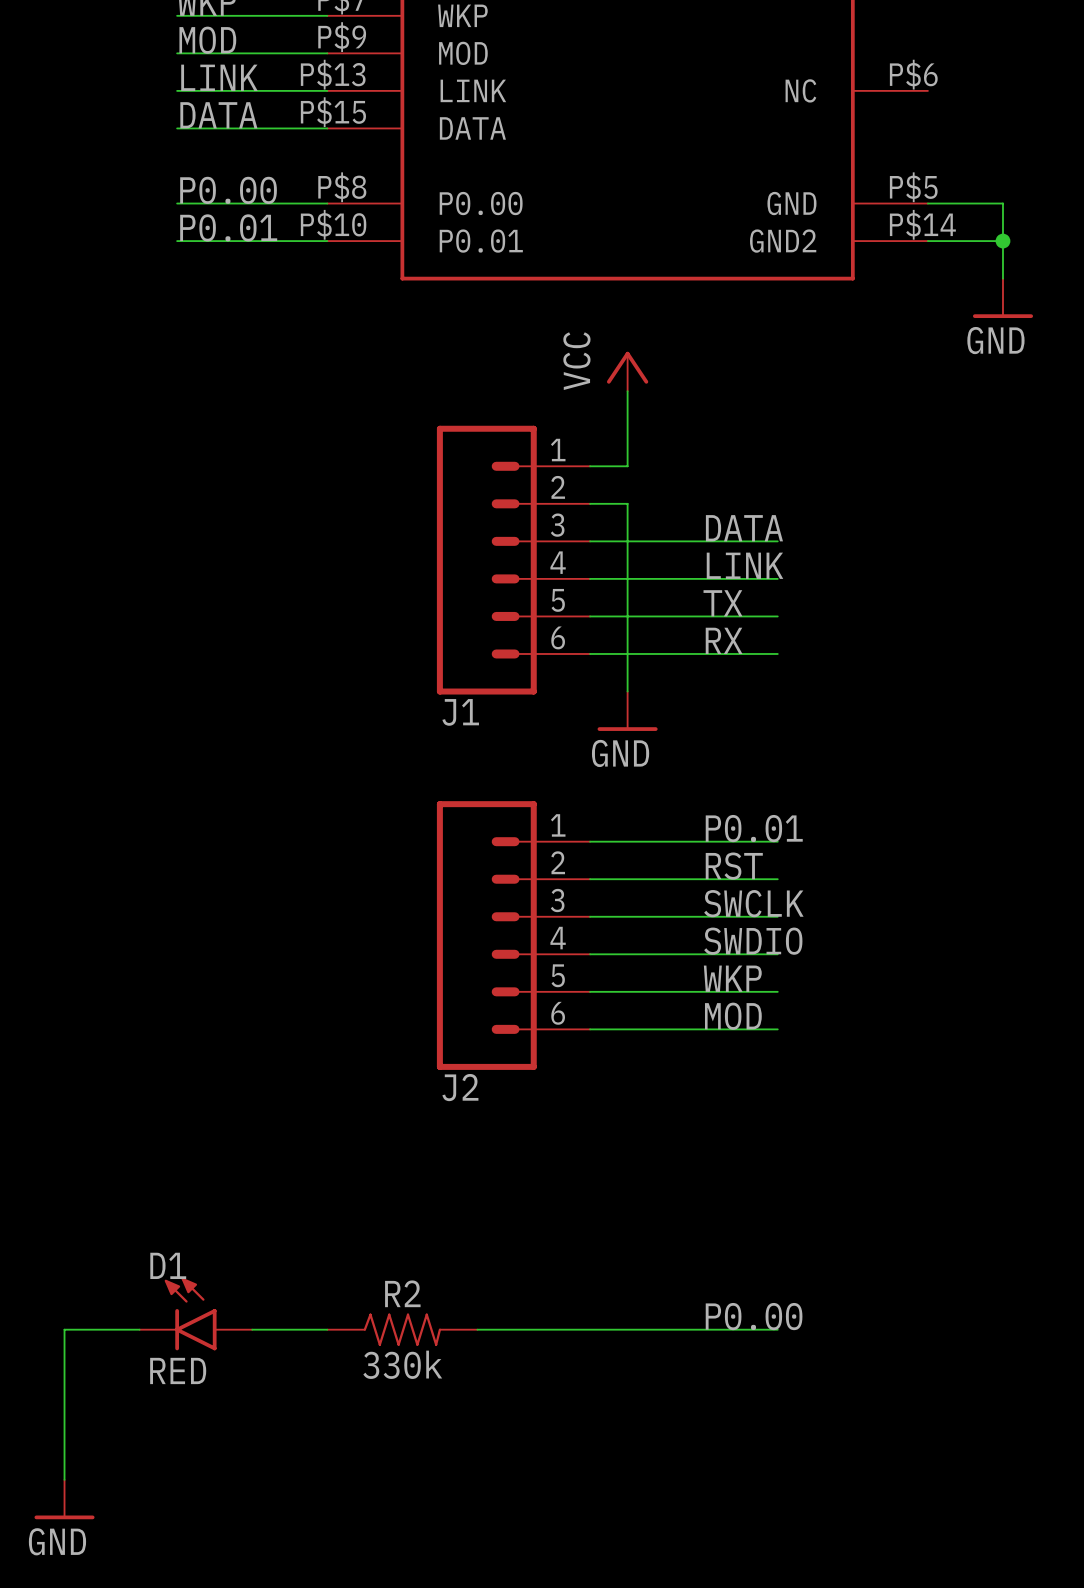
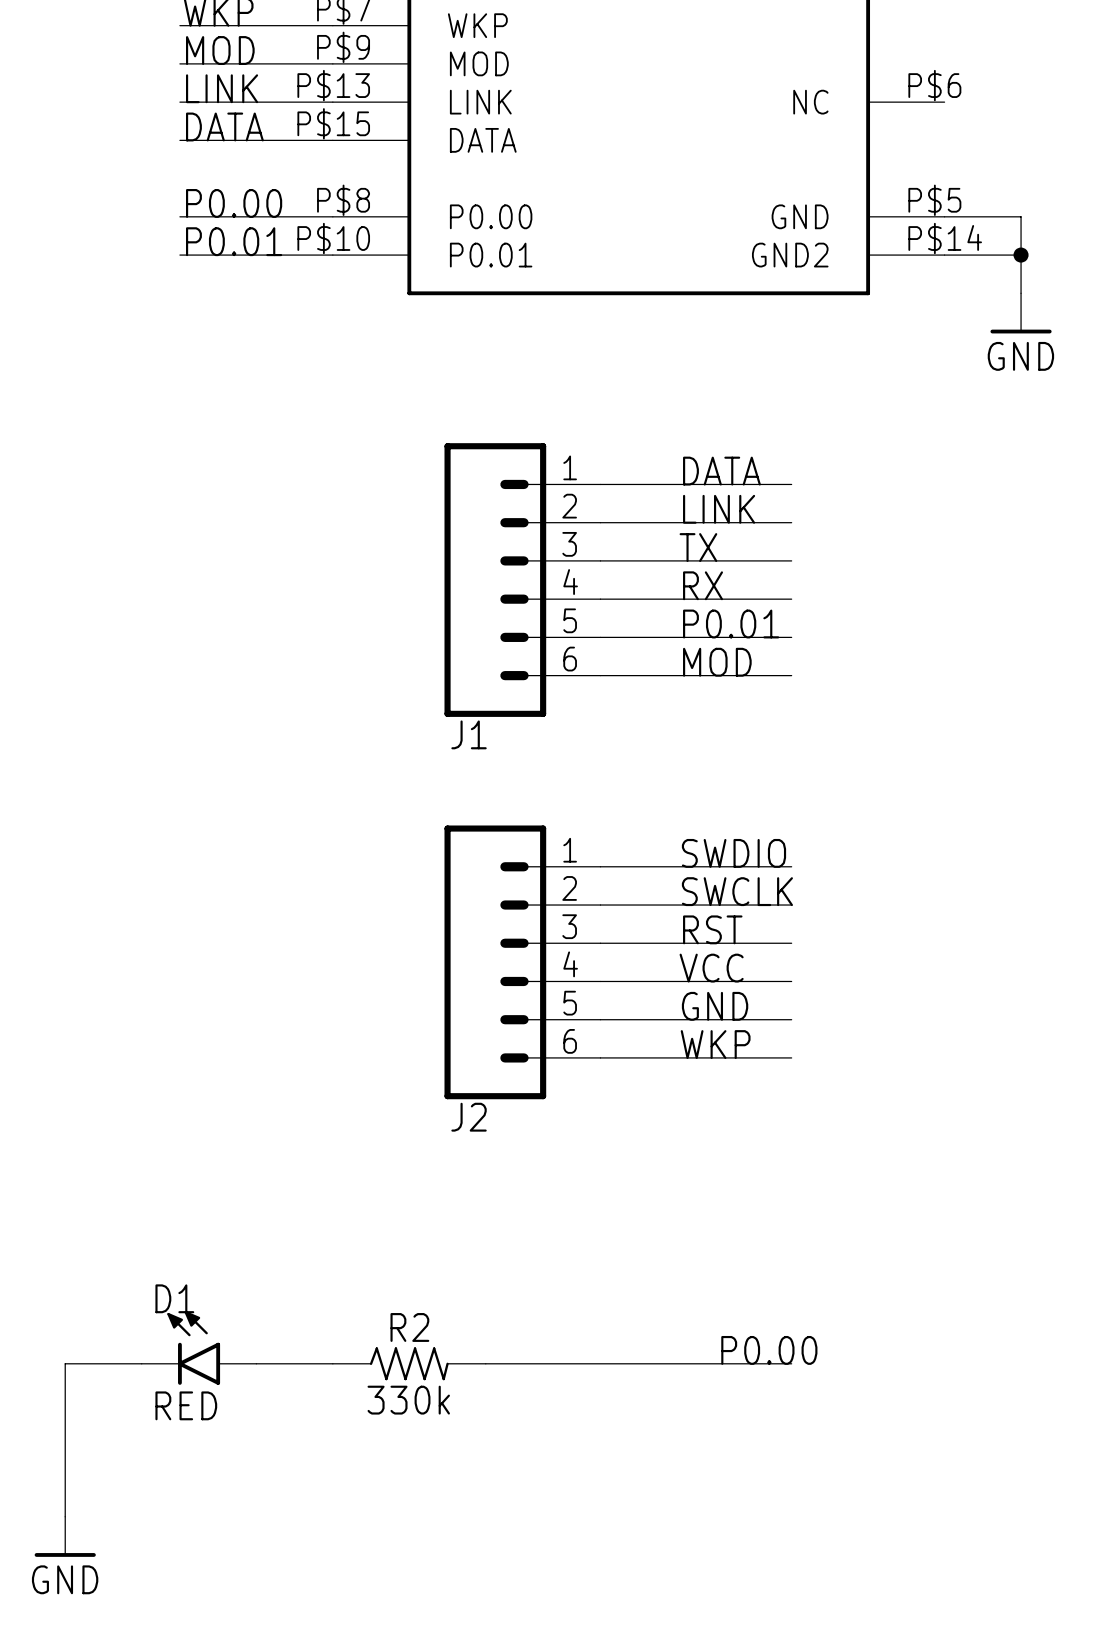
power symbol: VCC (627, 371) -> none
wire: (627, 391) (627, 466) -> (791, 484) (638, 484)
wire: (627, 503) (627, 691) -> (638, 522) (791, 522)
label position: DATA (744, 528) -> DATA (721, 471)
label position: LINK (745, 565) -> LINK (719, 509)
label position: TX (723, 603) -> TX (698, 547)
label: none -> MOD (717, 662)
label position: RX (724, 640) -> RX (703, 585)
power symbol: GND (627, 711) -> none
label position: P0.01 (754, 828) -> P0.01 (731, 624)
label position: RST (734, 866) -> RST (712, 929)
label position: SWCLK (753, 903) -> SWCLK (737, 891)
label: none -> VCC (711, 968)
label position: SWDIO (753, 941) -> SWDIO (733, 853)
label: none -> GND (715, 1006)
label position: WKP (732, 978) -> WKP (715, 1044)
label: MOD (733, 1016) -> none

